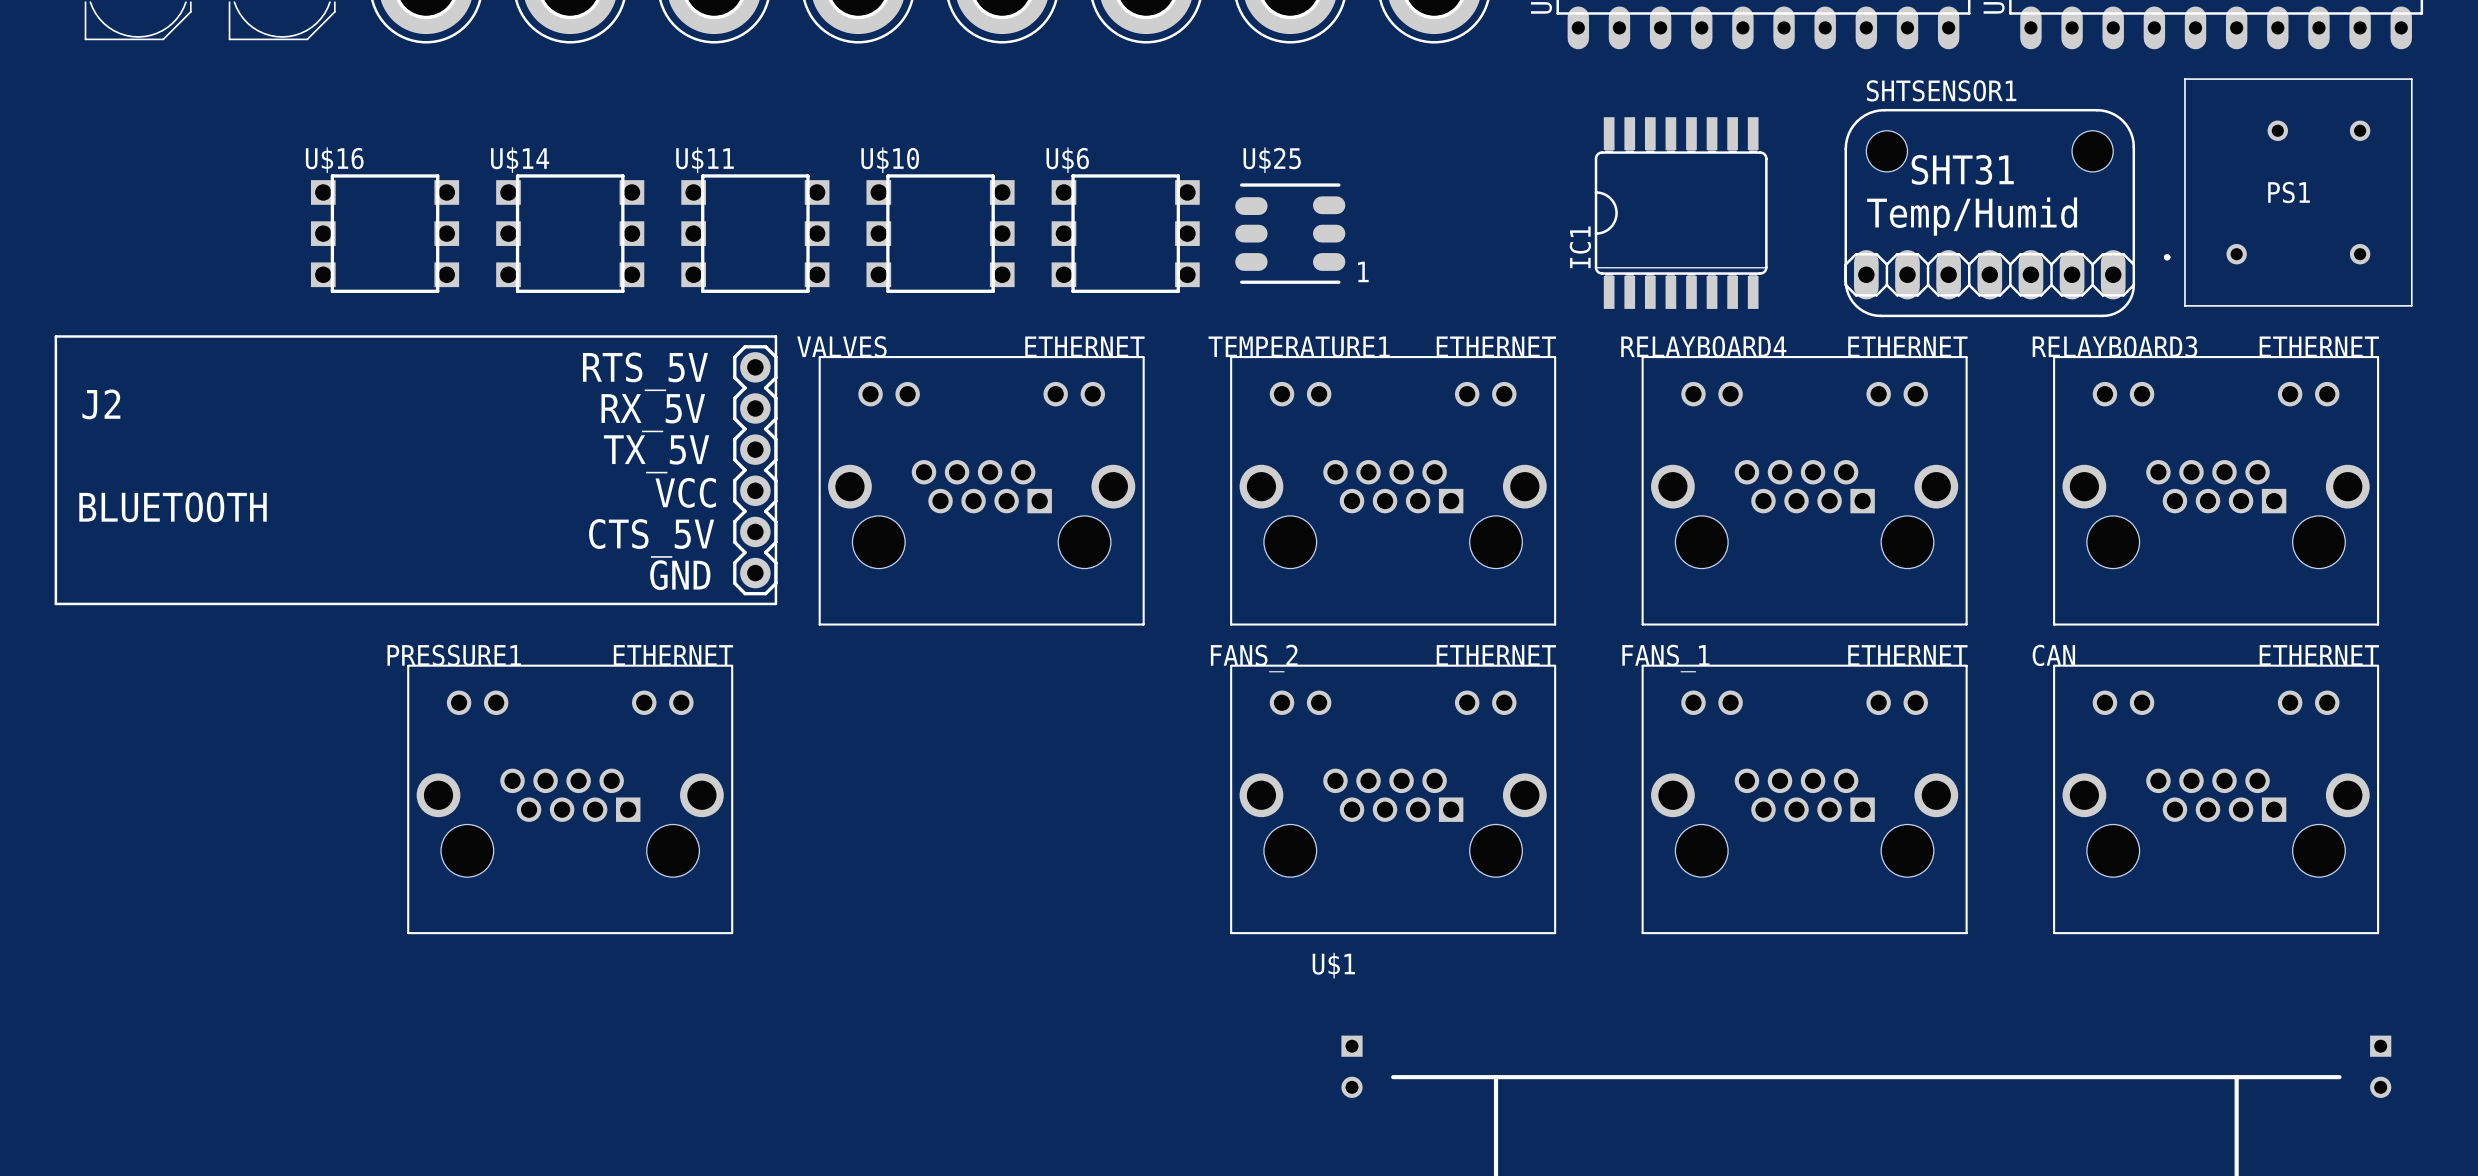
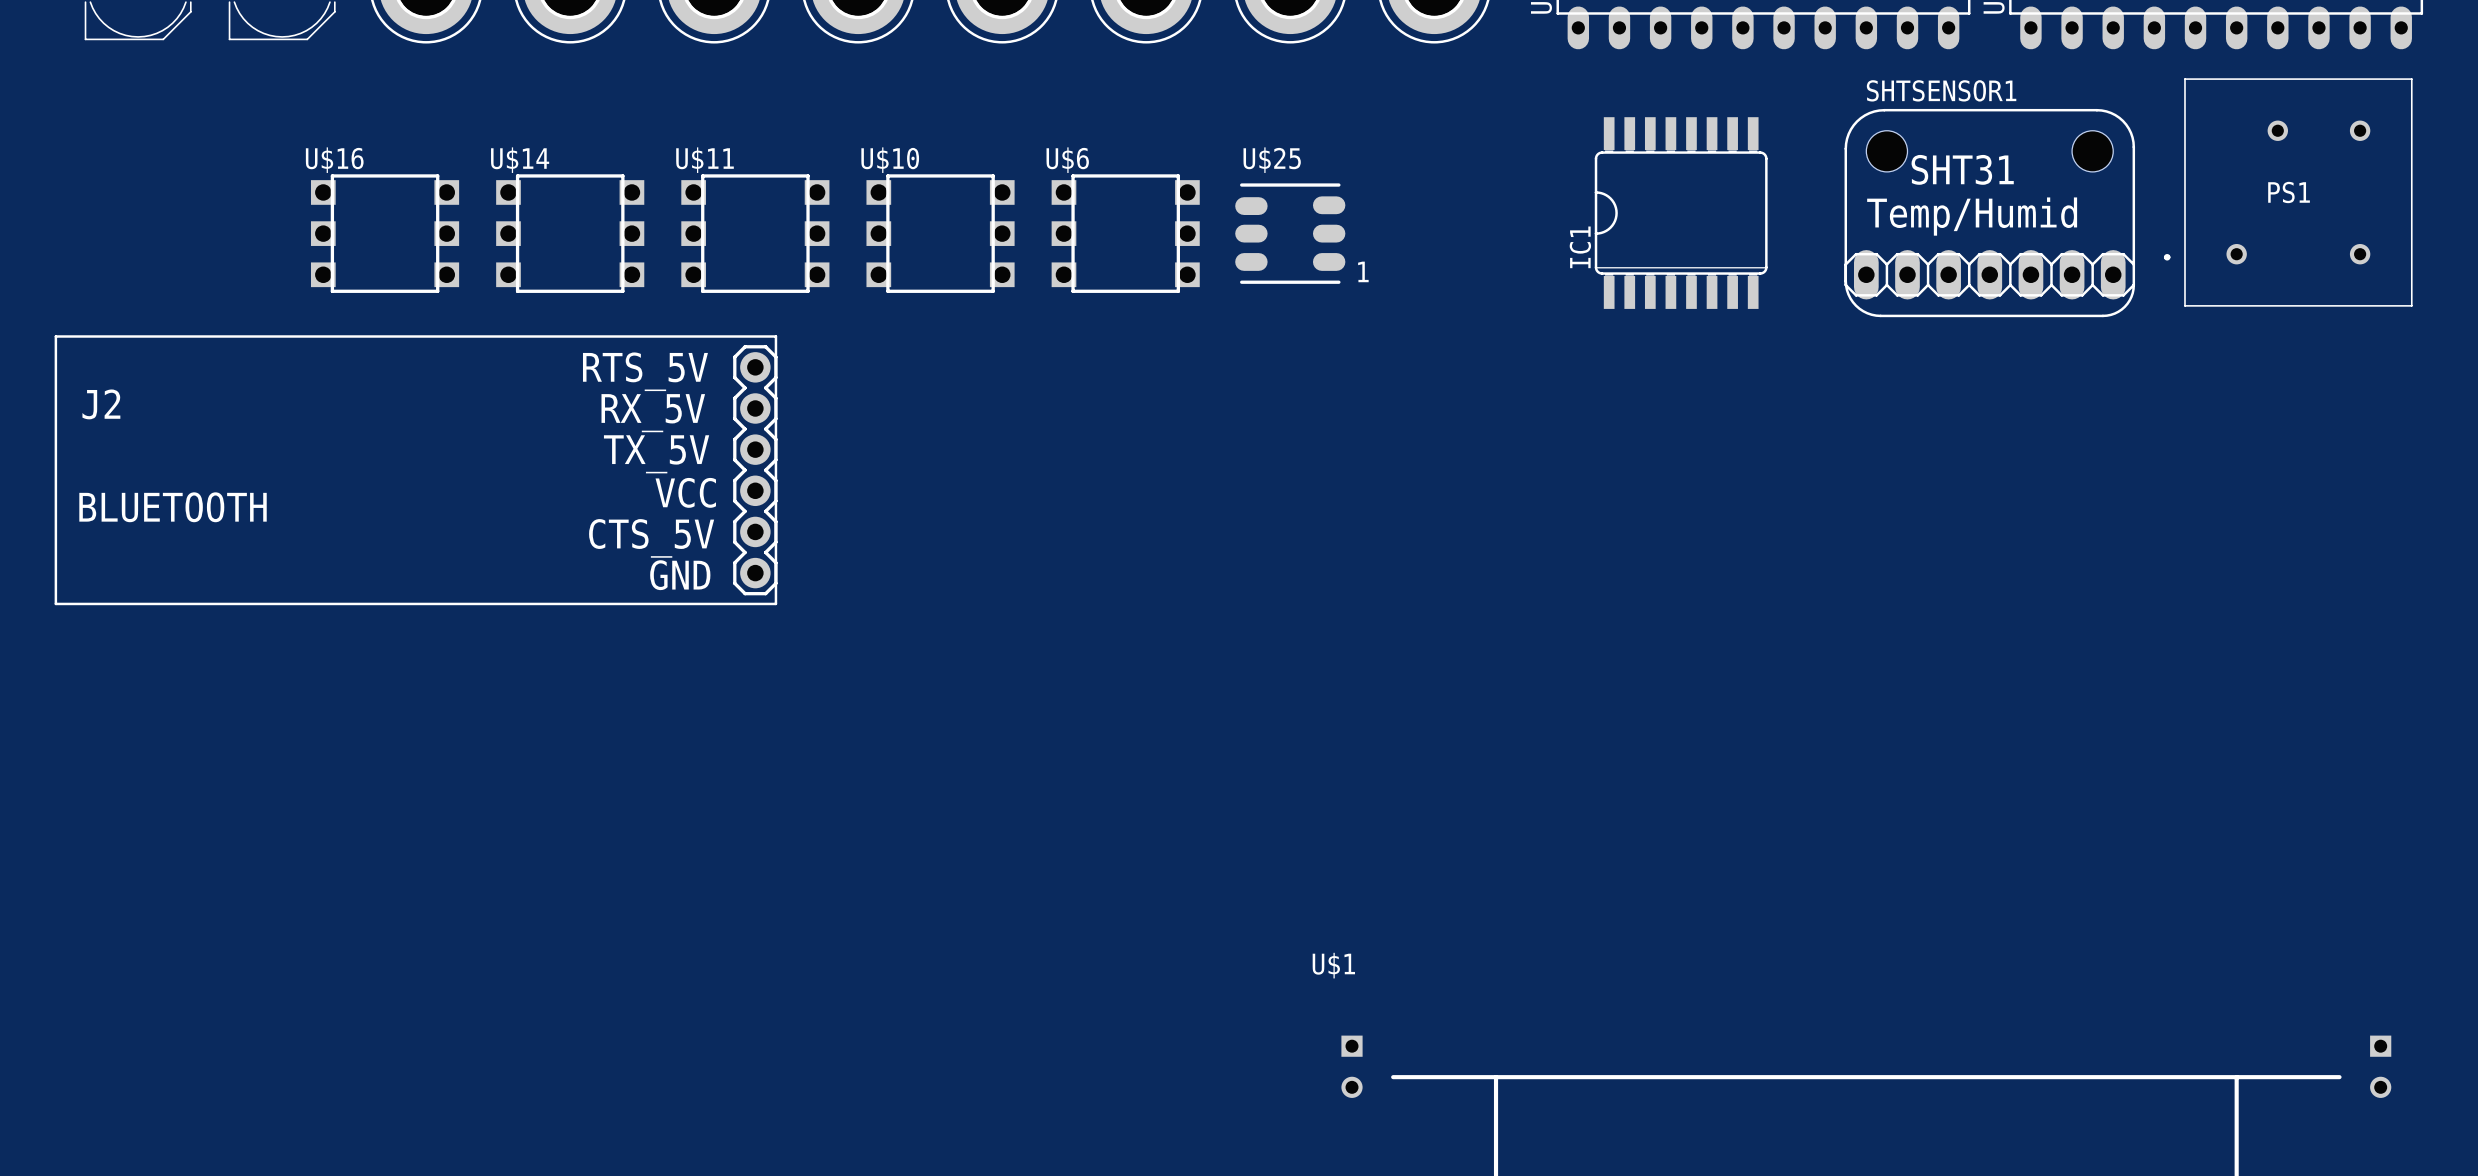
VALVES: ETHERNET (981, 490) -> none
TEMPERATURE1: ETHERNET (1393, 490) -> none
RELAYBOARD4: ETHERNET (1804, 490) -> none
RELAYBOARD3: ETHERNET (2216, 490) -> none
PRESSURE1: ETHERNET (570, 799) -> none
FANS_2: ETHERNET (1393, 799) -> none
FANS_1: ETHERNET (1804, 799) -> none
CAN: ETHERNET (2216, 799) -> none

